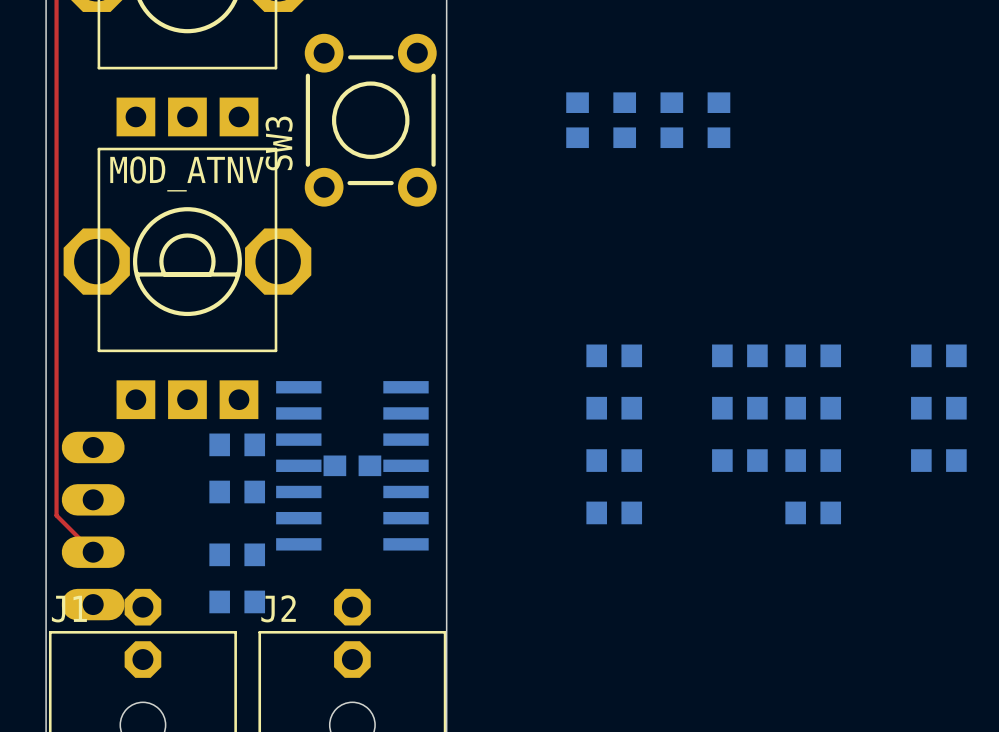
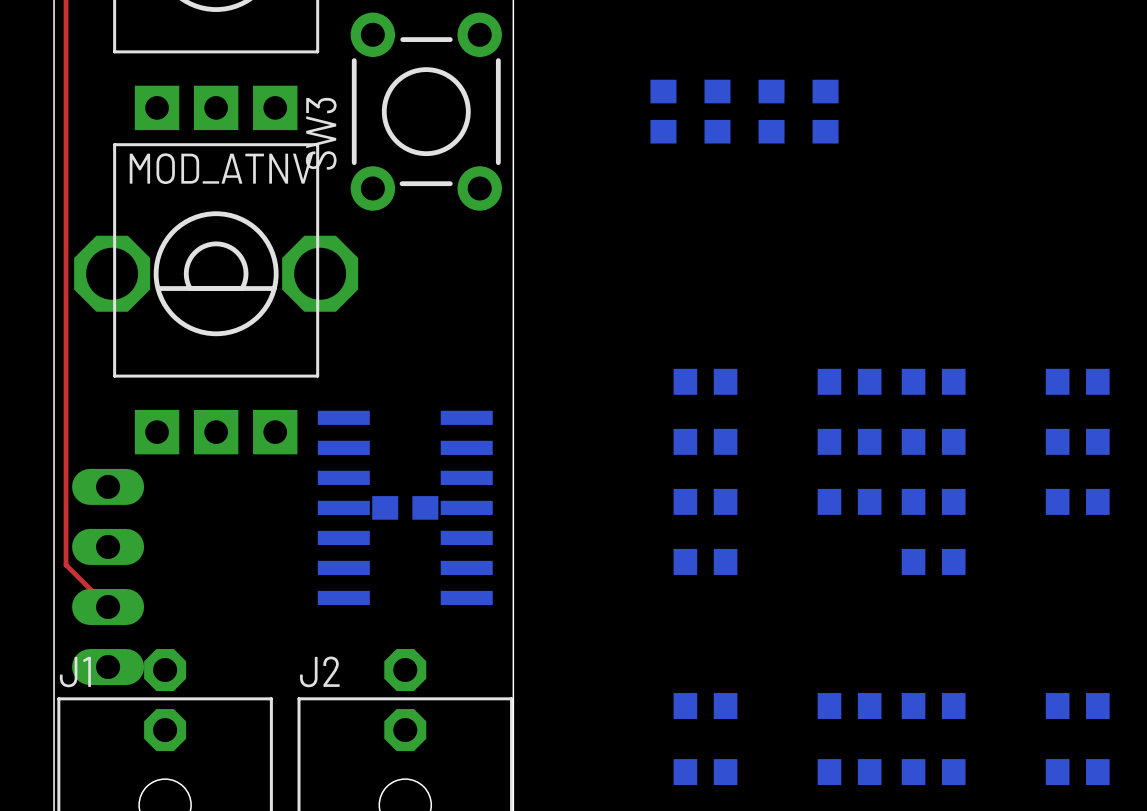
part: (237, 444) -> none
part: (237, 491) -> none
part: (237, 554) -> none
part: (237, 601) -> none
part: none -> (705, 706)
part: none -> (849, 706)
part: none -> (933, 706)
part: none -> (1077, 706)
part: none -> (705, 772)
part: none -> (849, 772)
part: none -> (933, 772)
part: none -> (1077, 772)

